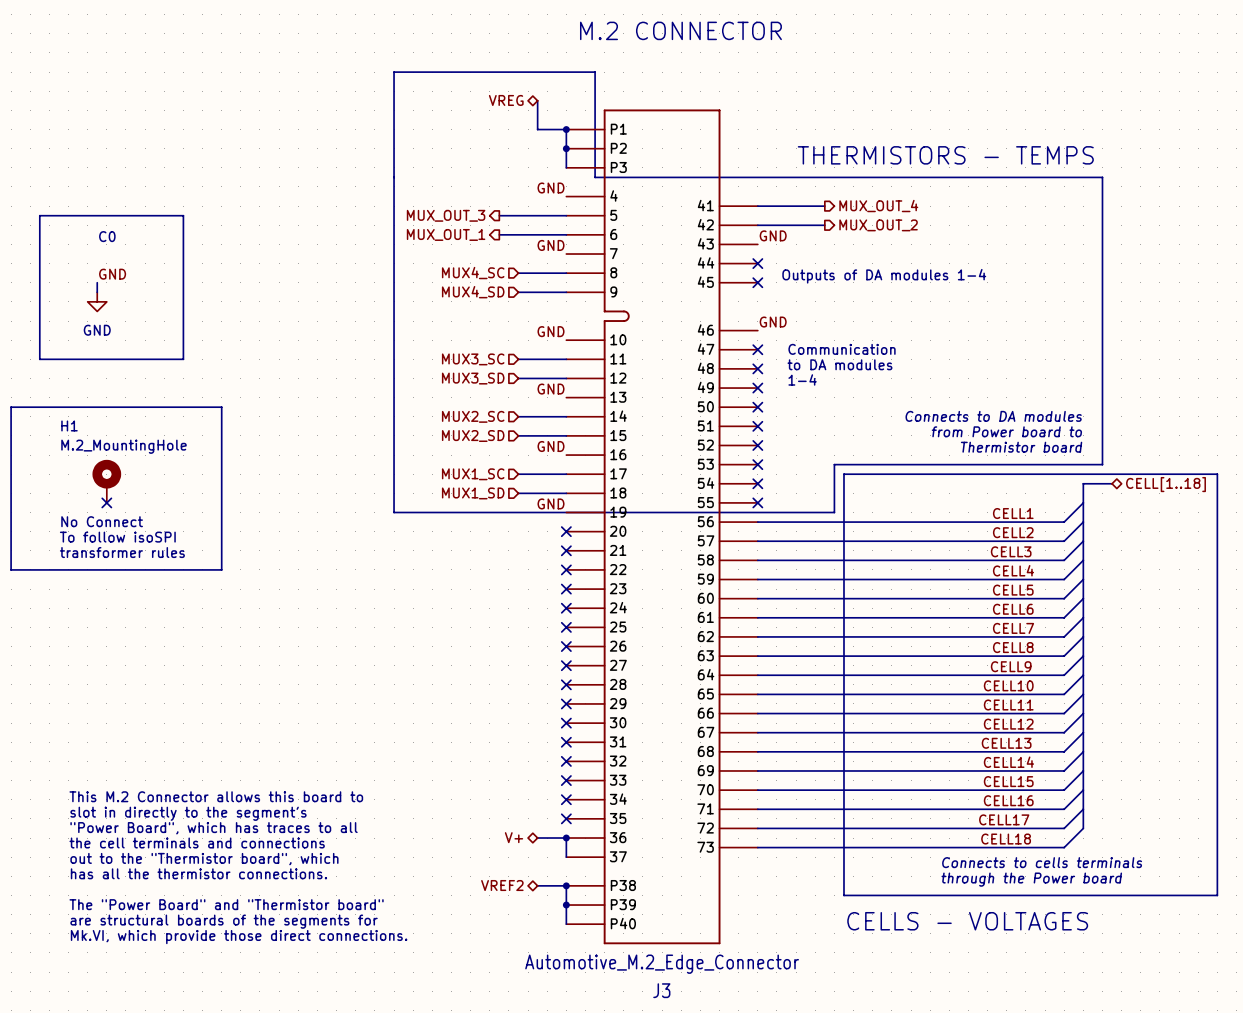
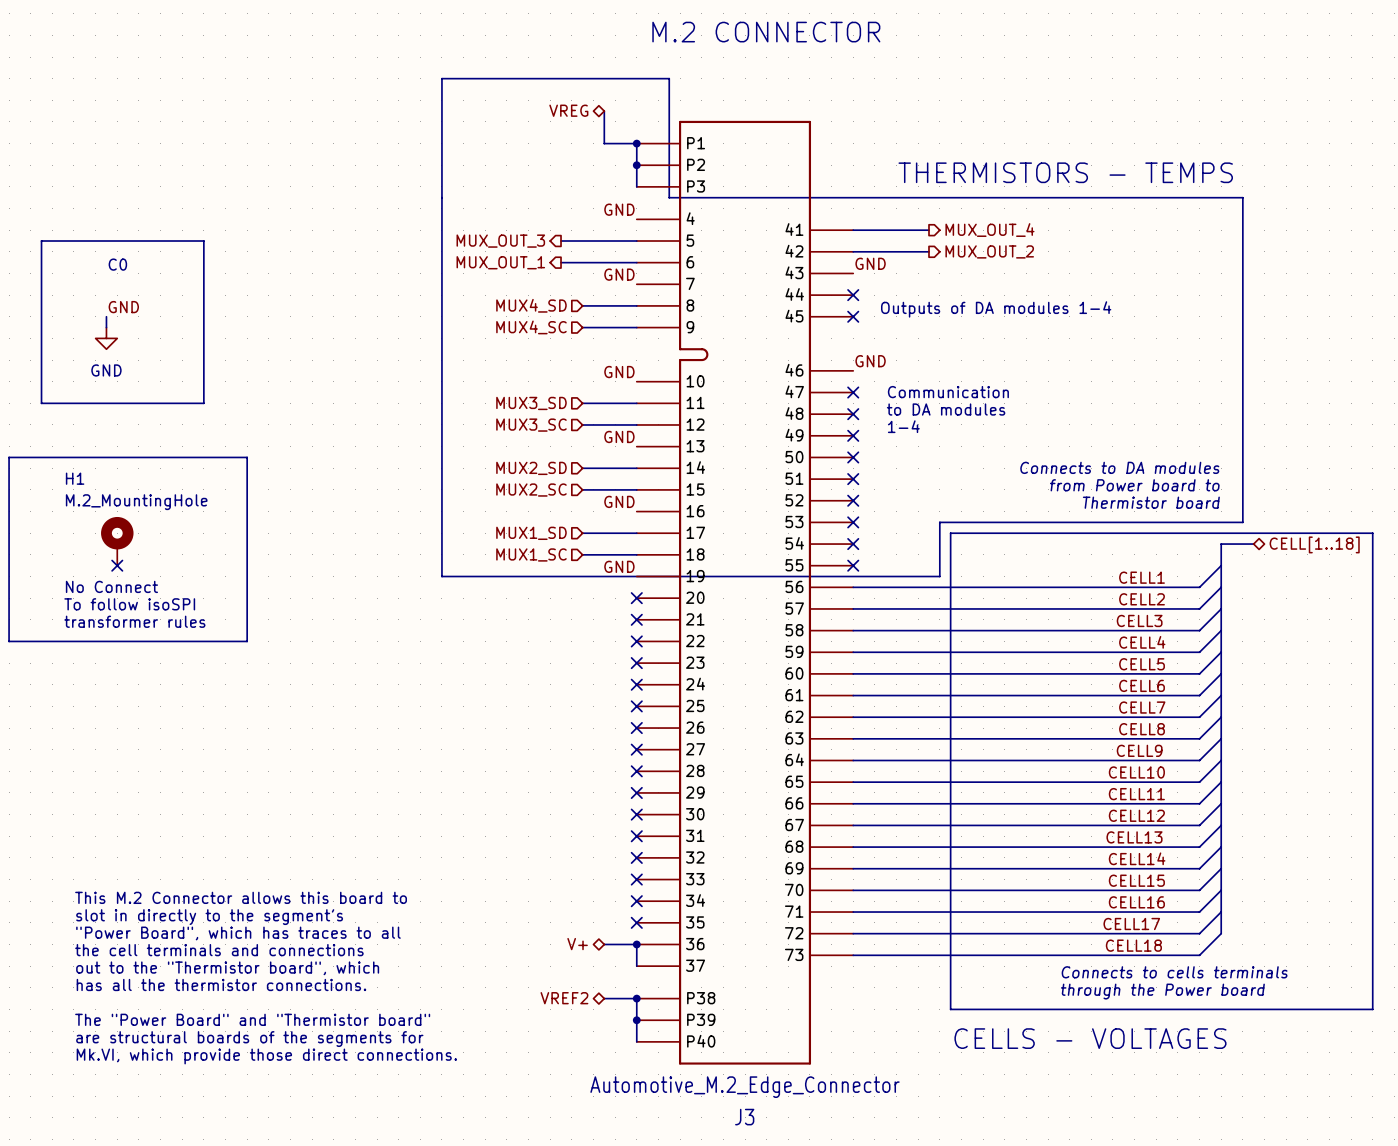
hierarchical label: MUX4_SC (473, 273) -> MUX4_SD (531, 305)
hierarchical label: MUX4_SD (473, 292) -> MUX4_SC (531, 327)
hierarchical label: MUX3_SC (473, 359) -> MUX3_SD (531, 403)
hierarchical label: MUX3_SD (473, 378) -> MUX3_SC (531, 425)
hierarchical label: MUX2_SC (473, 416) -> MUX2_SD (531, 468)
hierarchical label: MUX2_SD (473, 436) -> MUX2_SC (531, 490)
hierarchical label: MUX1_SC (473, 474) -> MUX1_SD (531, 533)
hierarchical label: MUX1_SD (473, 493) -> MUX1_SC (531, 554)

